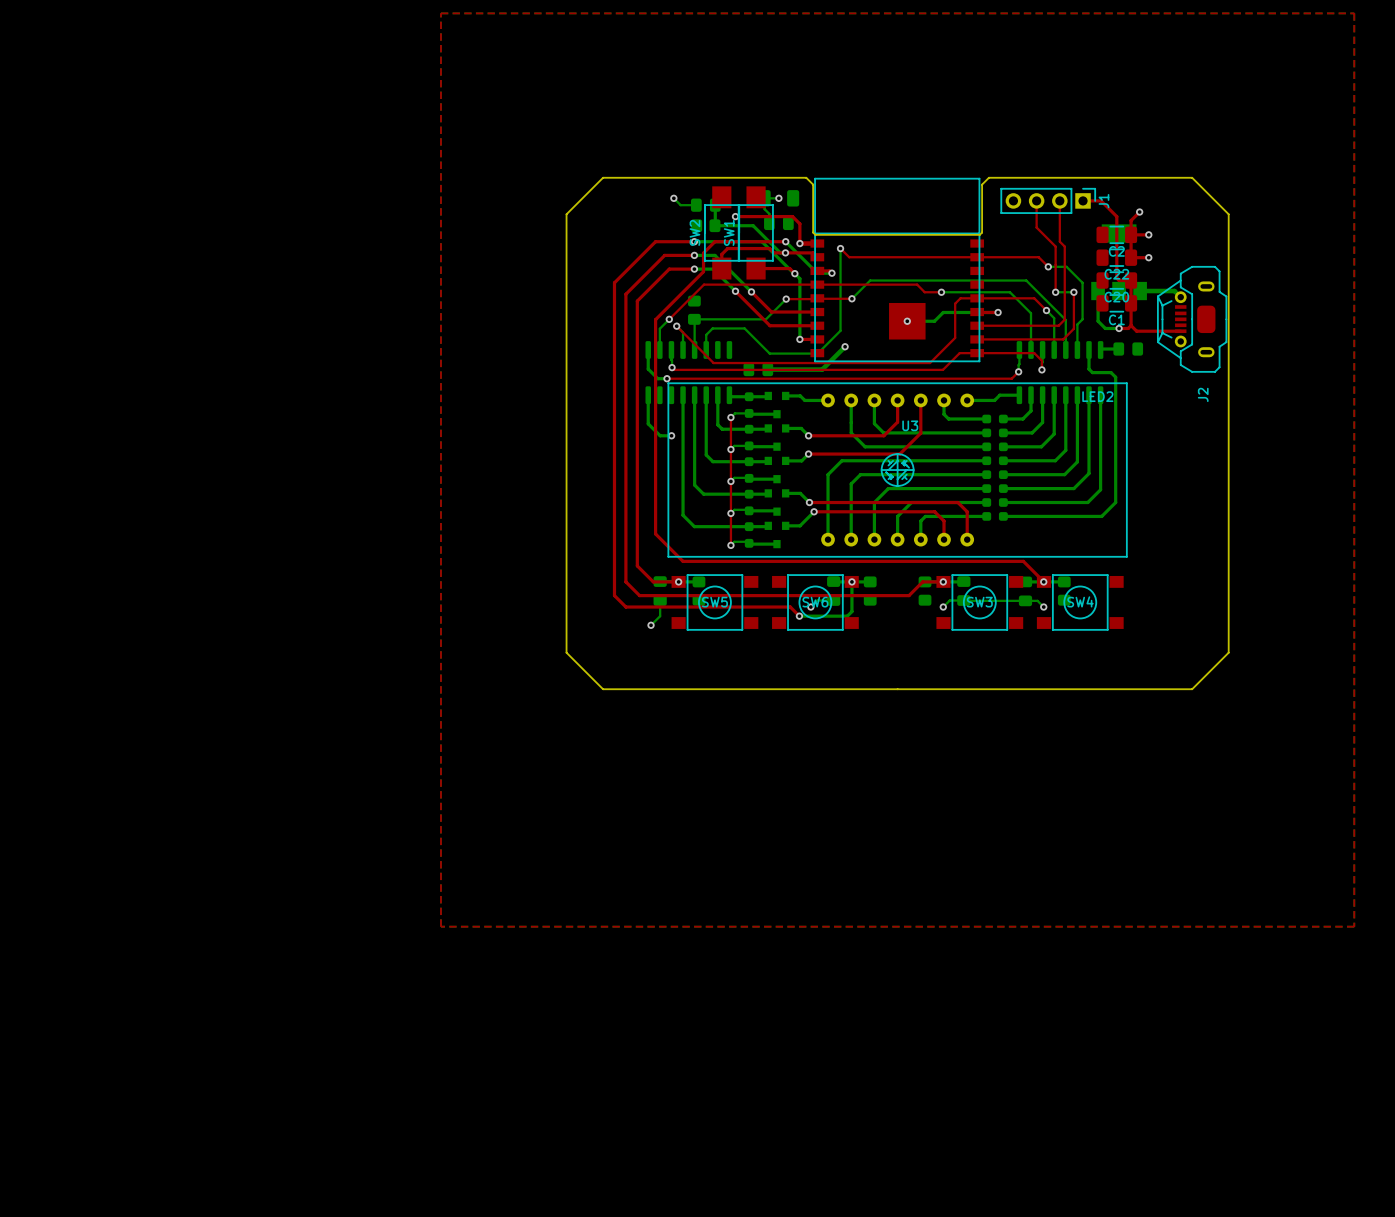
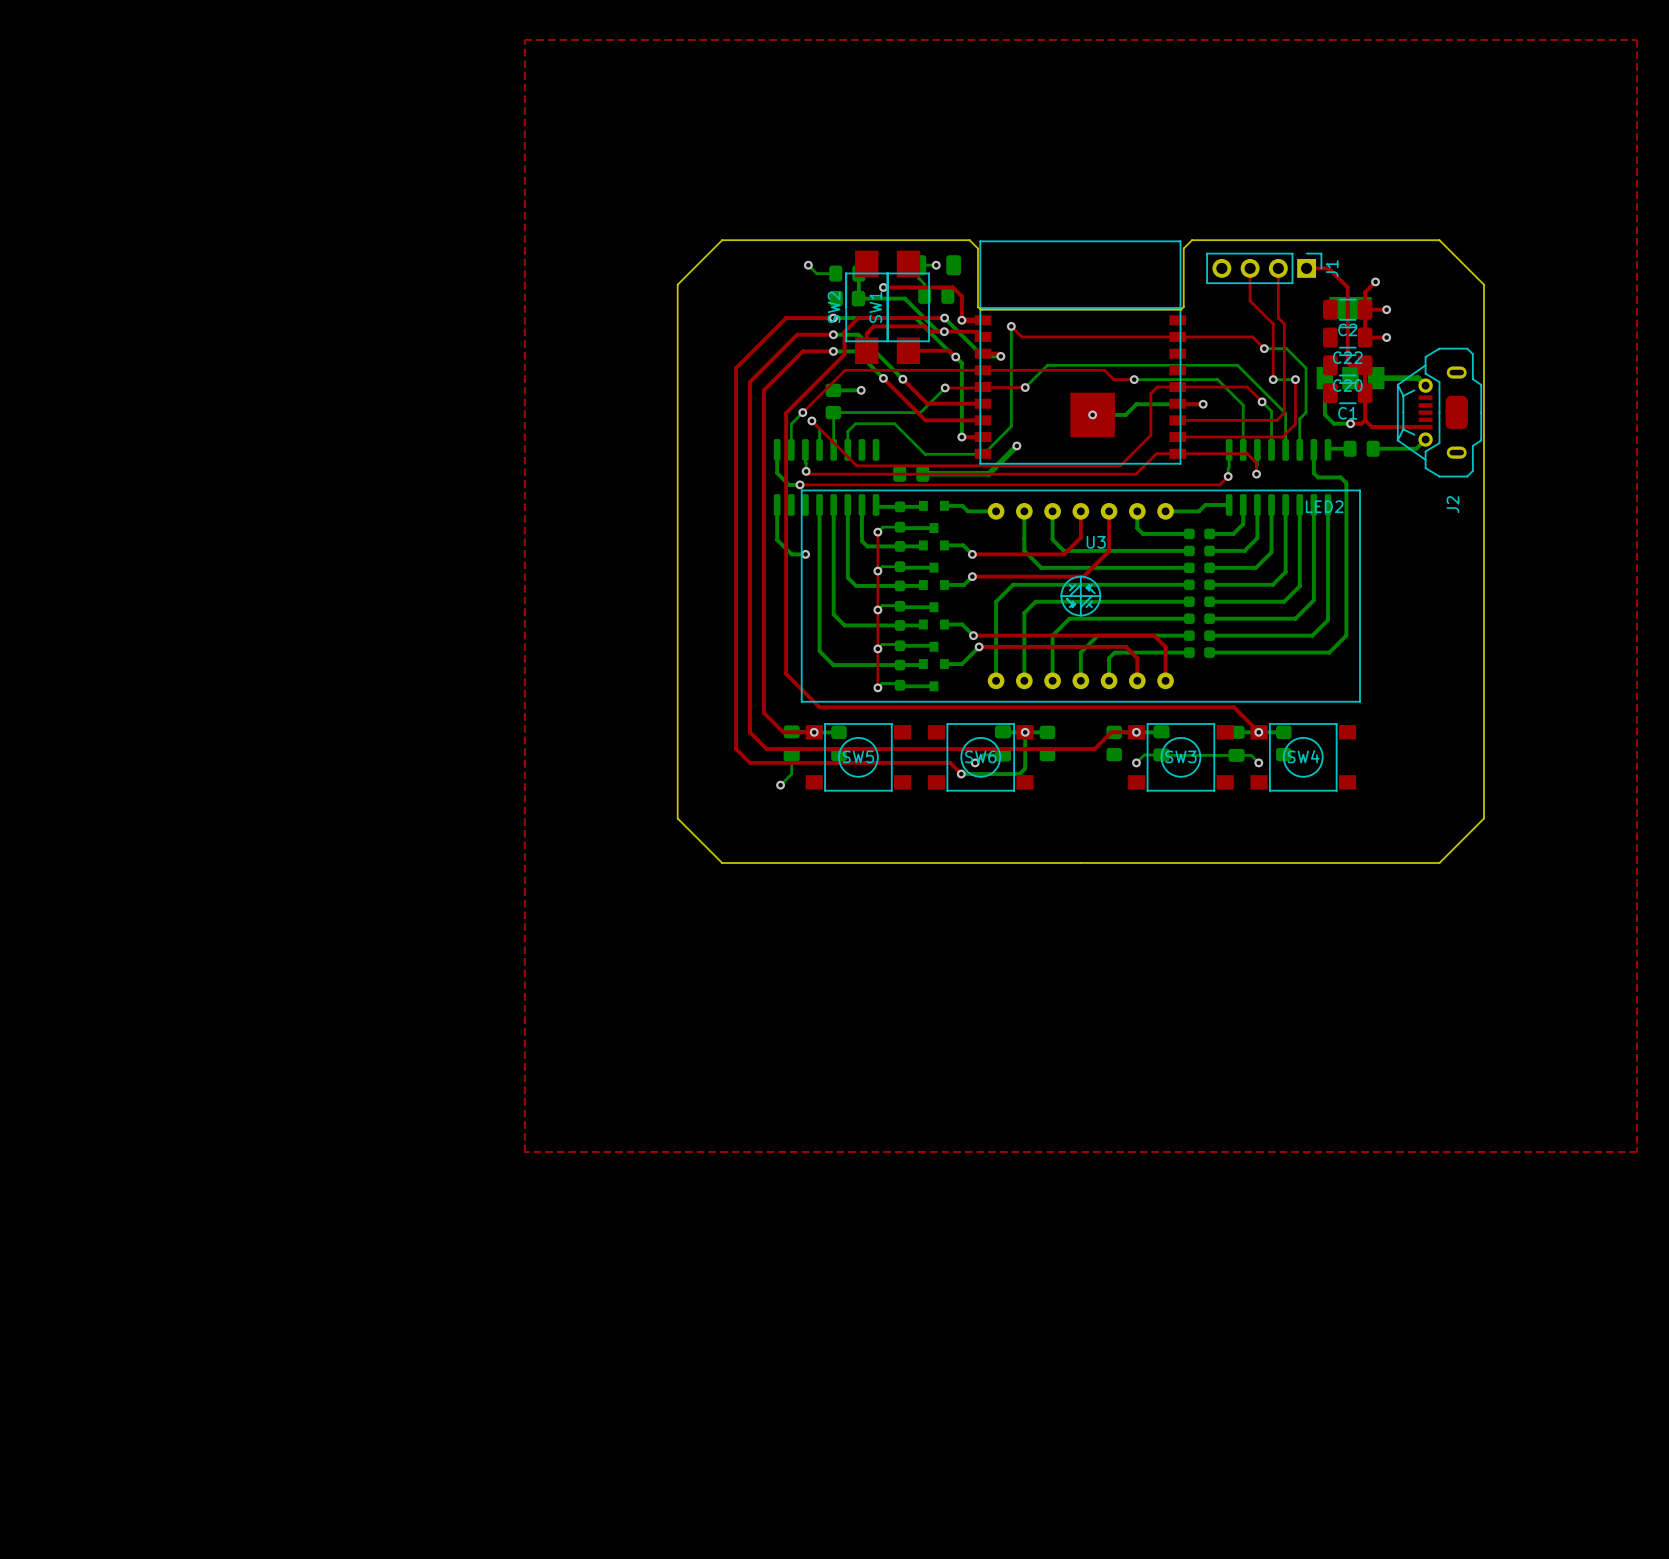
bottom track: none -> (833, 390) (861, 390)
via: none -> (861, 390)
bottom track: none -> (1425, 439) (1416, 448) (1373, 448) (1373, 446)

